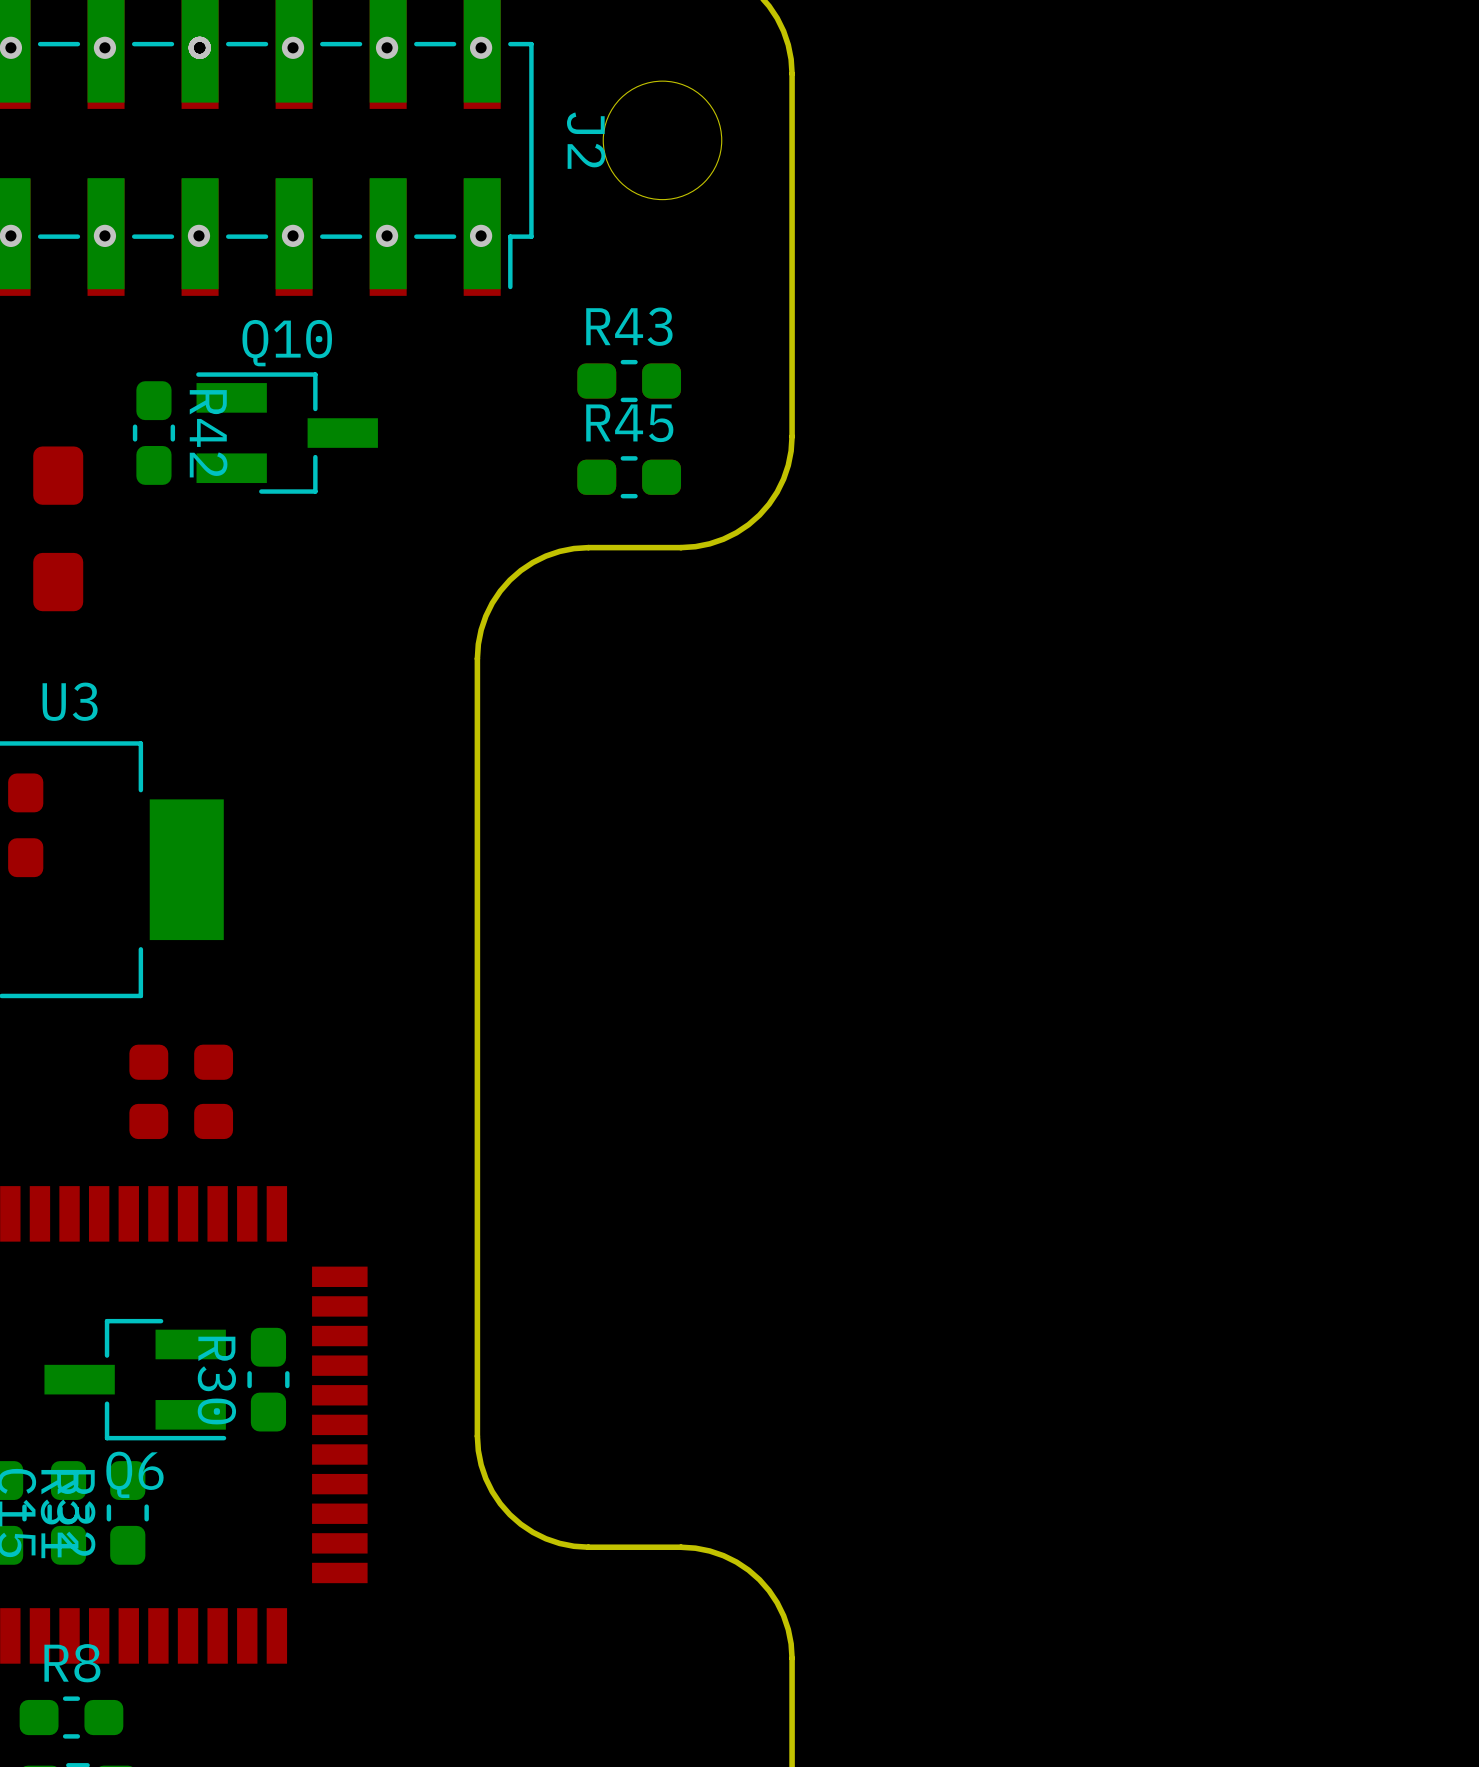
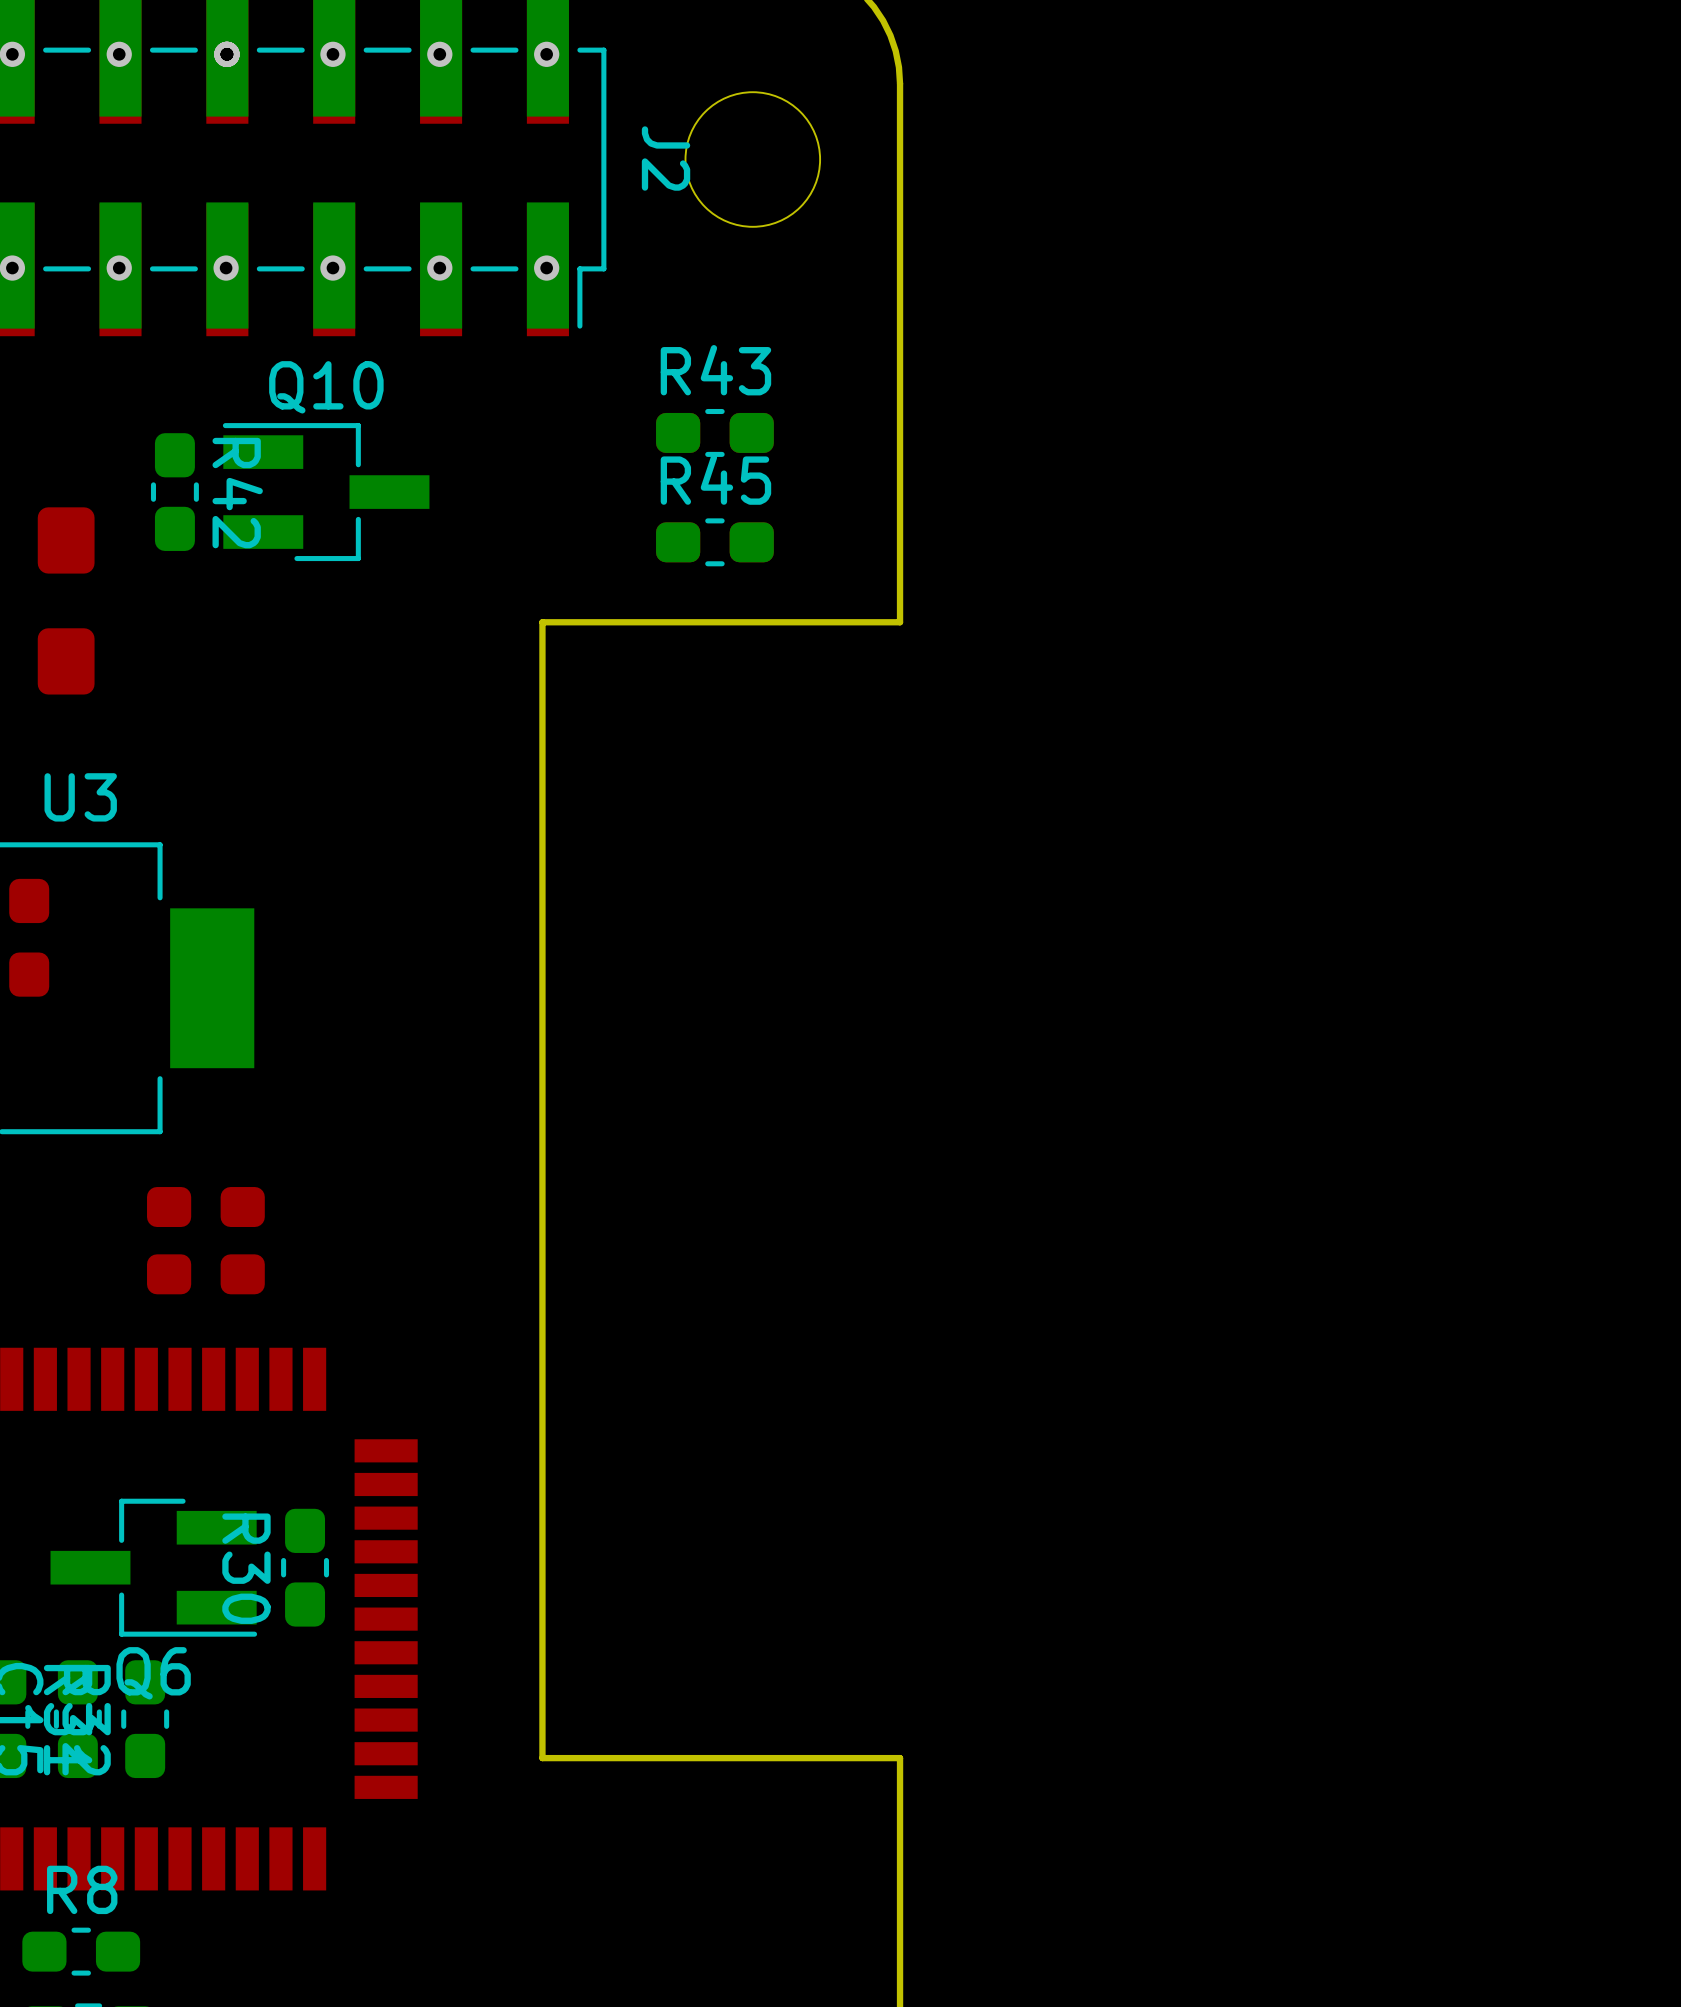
board edge: (792, 436) (791, 451) (783, 479) (777, 492) (759, 515) (736, 532) (723, 539) (695, 546) (681, 547) -> (900, 496) (900, 622) (773, 622)
board edge: (588, 547) (573, 548) (545, 556) (532, 562) (509, 580) (492, 603) (485, 616) (478, 644) (477, 658) -> (668, 622) (542, 622) (542, 748)
board edge: (477, 1436) (478, 1450) (485, 1478) (492, 1491) (509, 1514) (532, 1532) (545, 1538) (573, 1546) (588, 1547) -> (542, 1631) (542, 1758) (668, 1758)
board edge: (681, 1547) (695, 1548) (723, 1555) (736, 1562) (759, 1579) (777, 1602) (783, 1615) (791, 1643) (792, 1658) -> (773, 1758) (900, 1758) (900, 1884)

